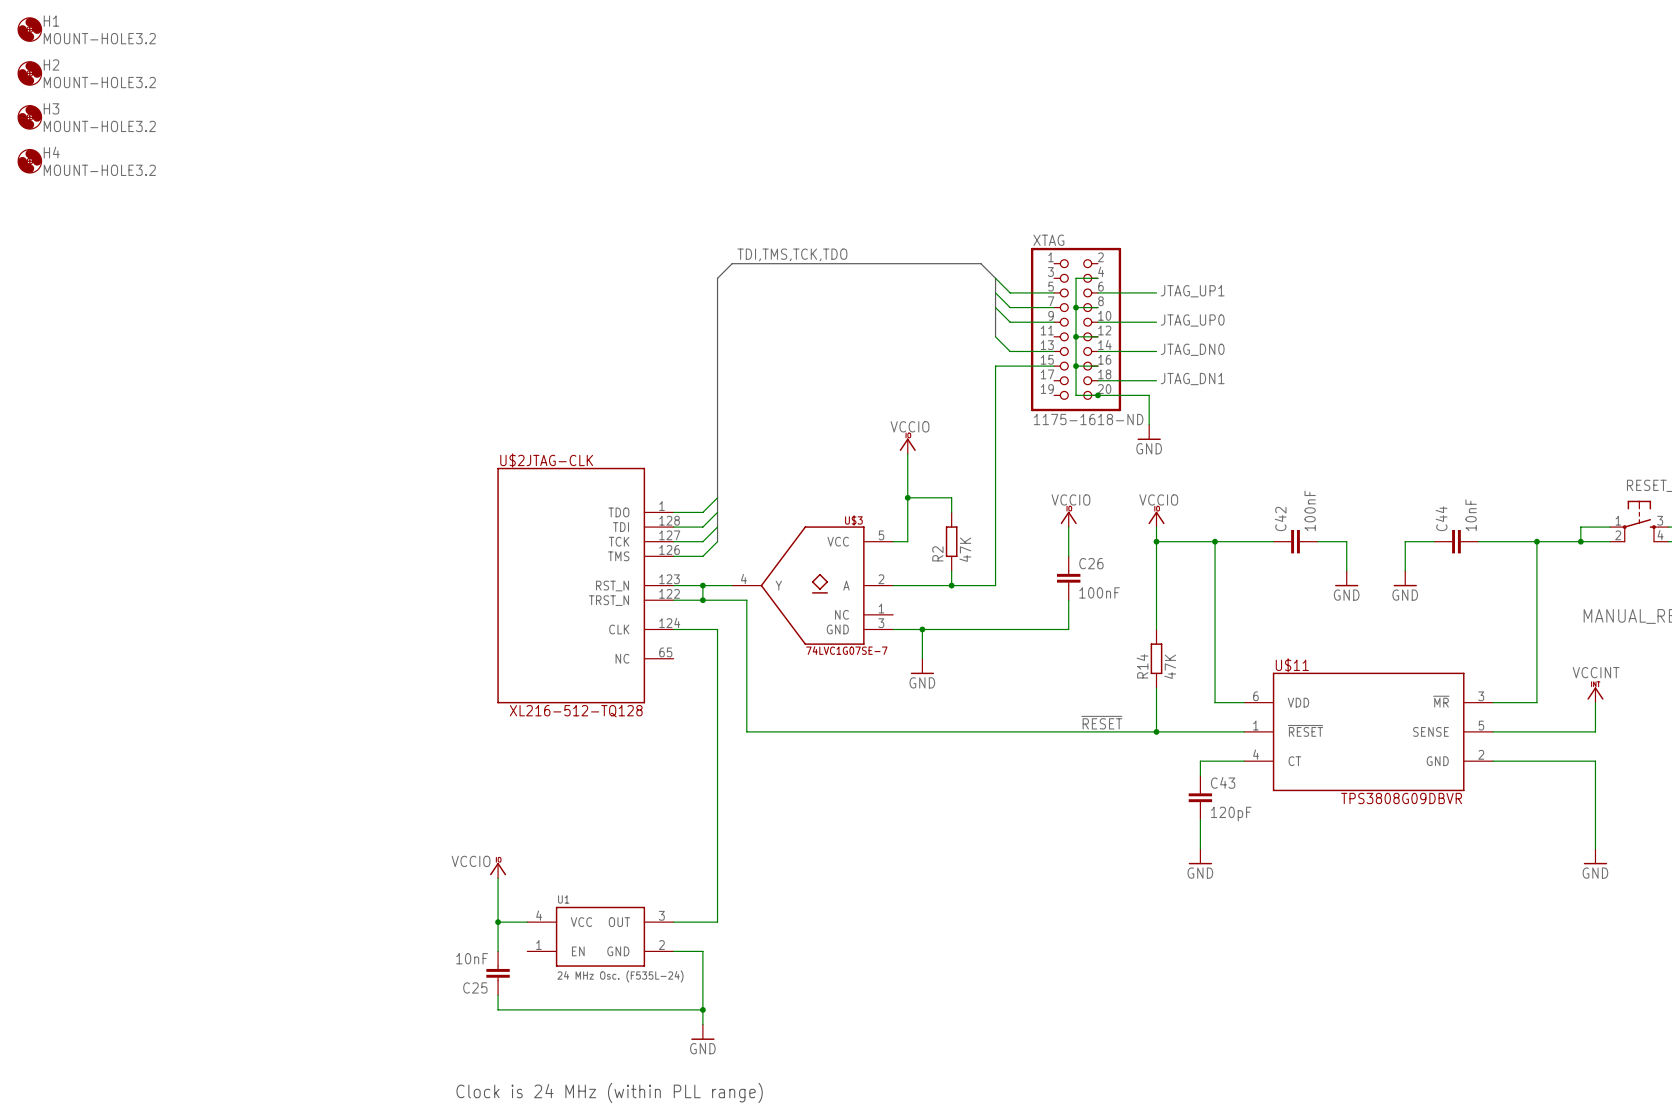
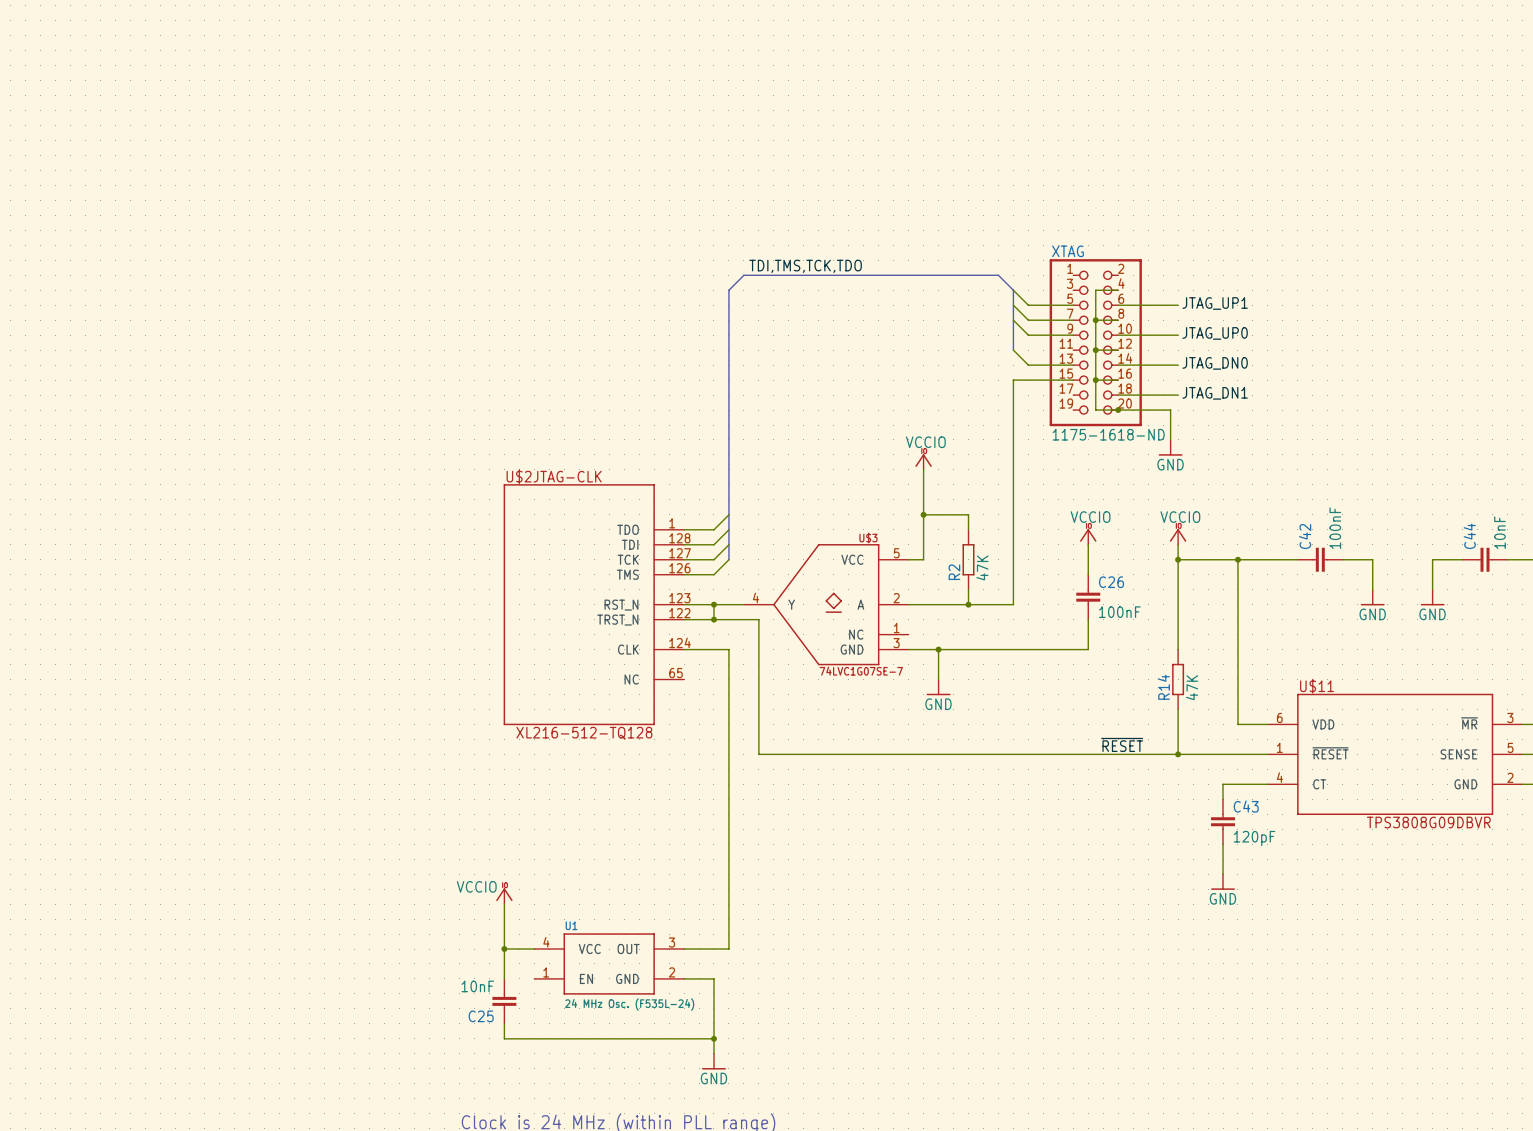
H1: MOUNT-HOLE3.2 (29, 29) -> none
H2: MOUNT-HOLE3.2 (29, 73) -> none
H3: MOUNT-HOLE3.2 (29, 117) -> none
H4: MOUNT-HOLE3.2 (29, 161) -> none

